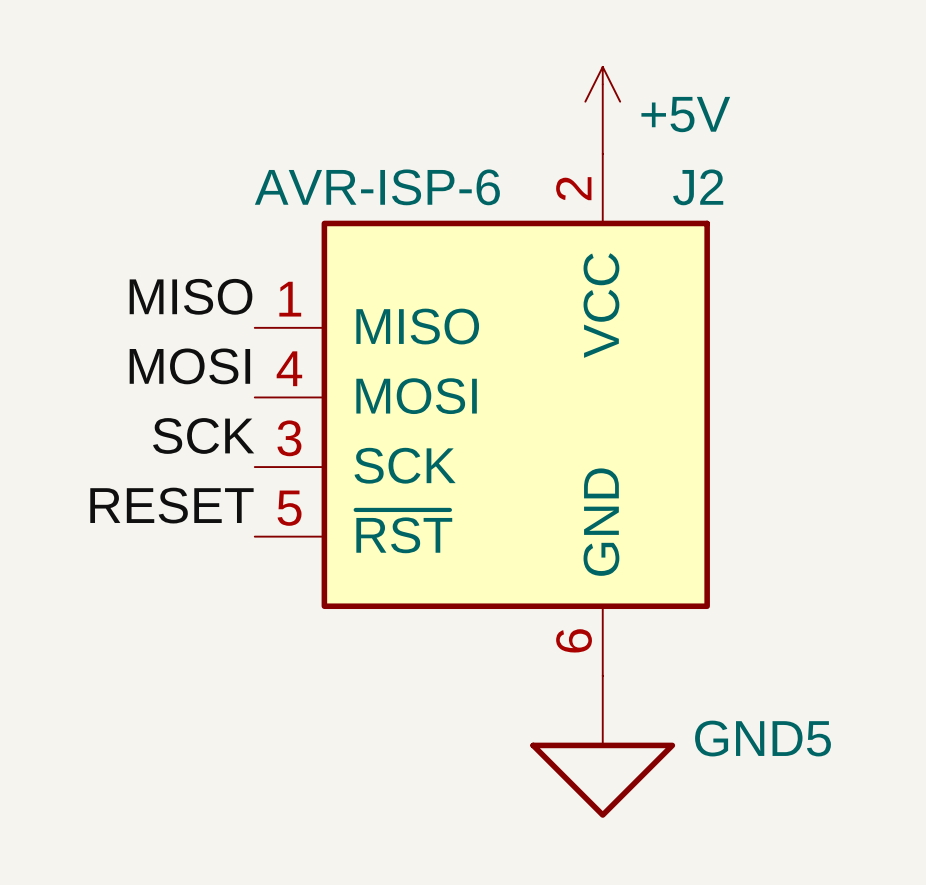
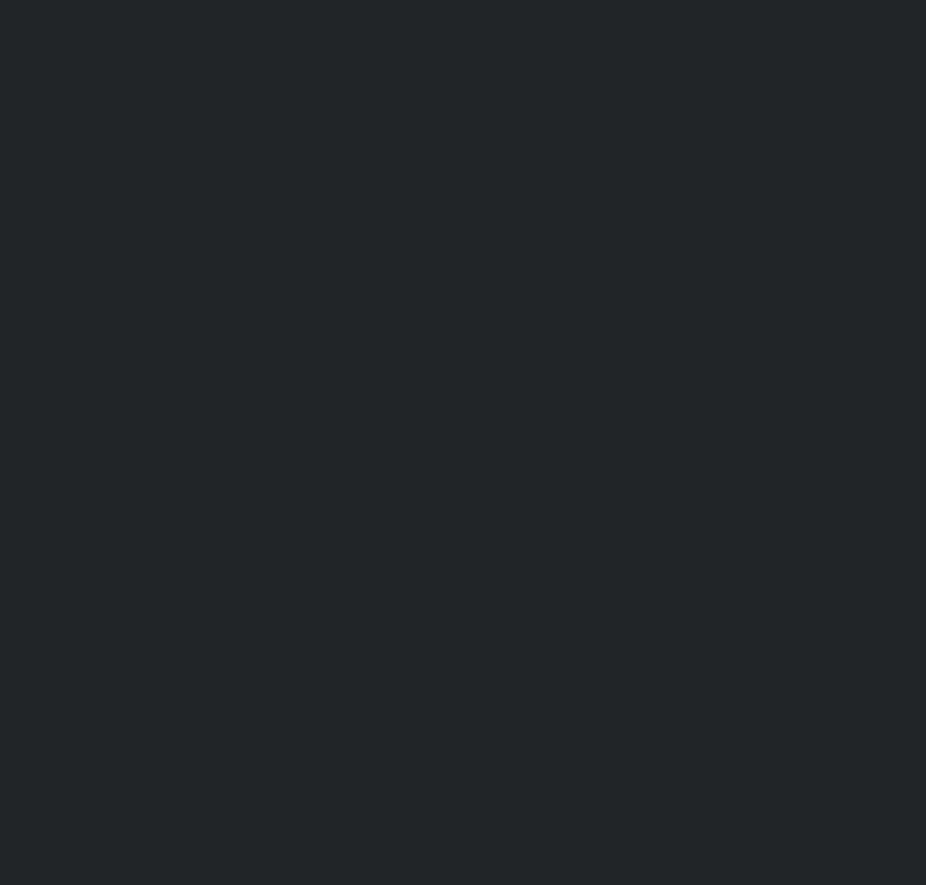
part: +5V (602, 110) -> none
label: MISO (191, 296) -> none
label: MOSI (189, 366) -> none
J2: AVR-ISP-6 (482, 414) -> none
label: SCK (203, 435) -> none
label: RESET (171, 505) -> none
GND5: (602, 746) -> none

